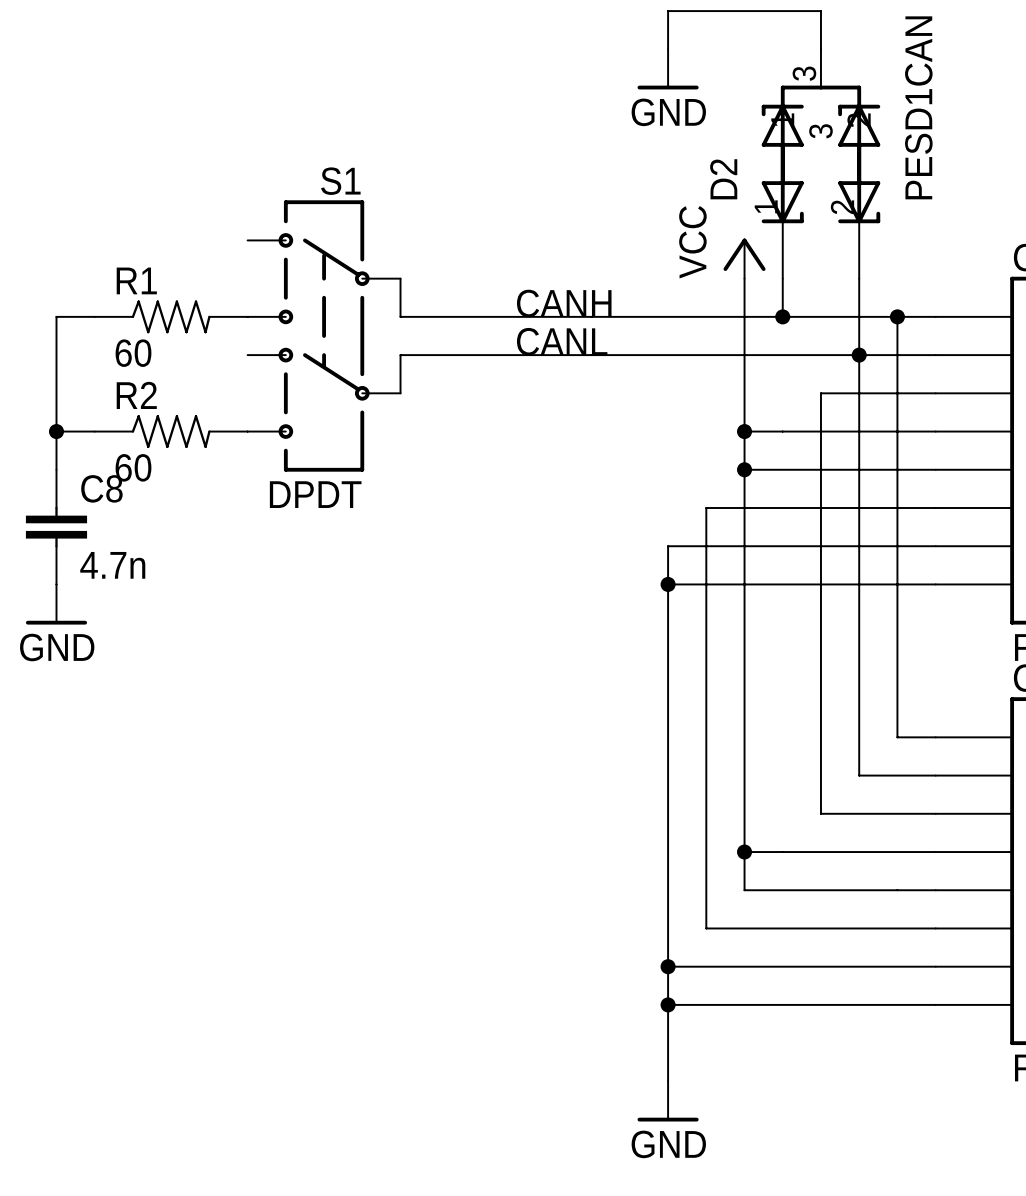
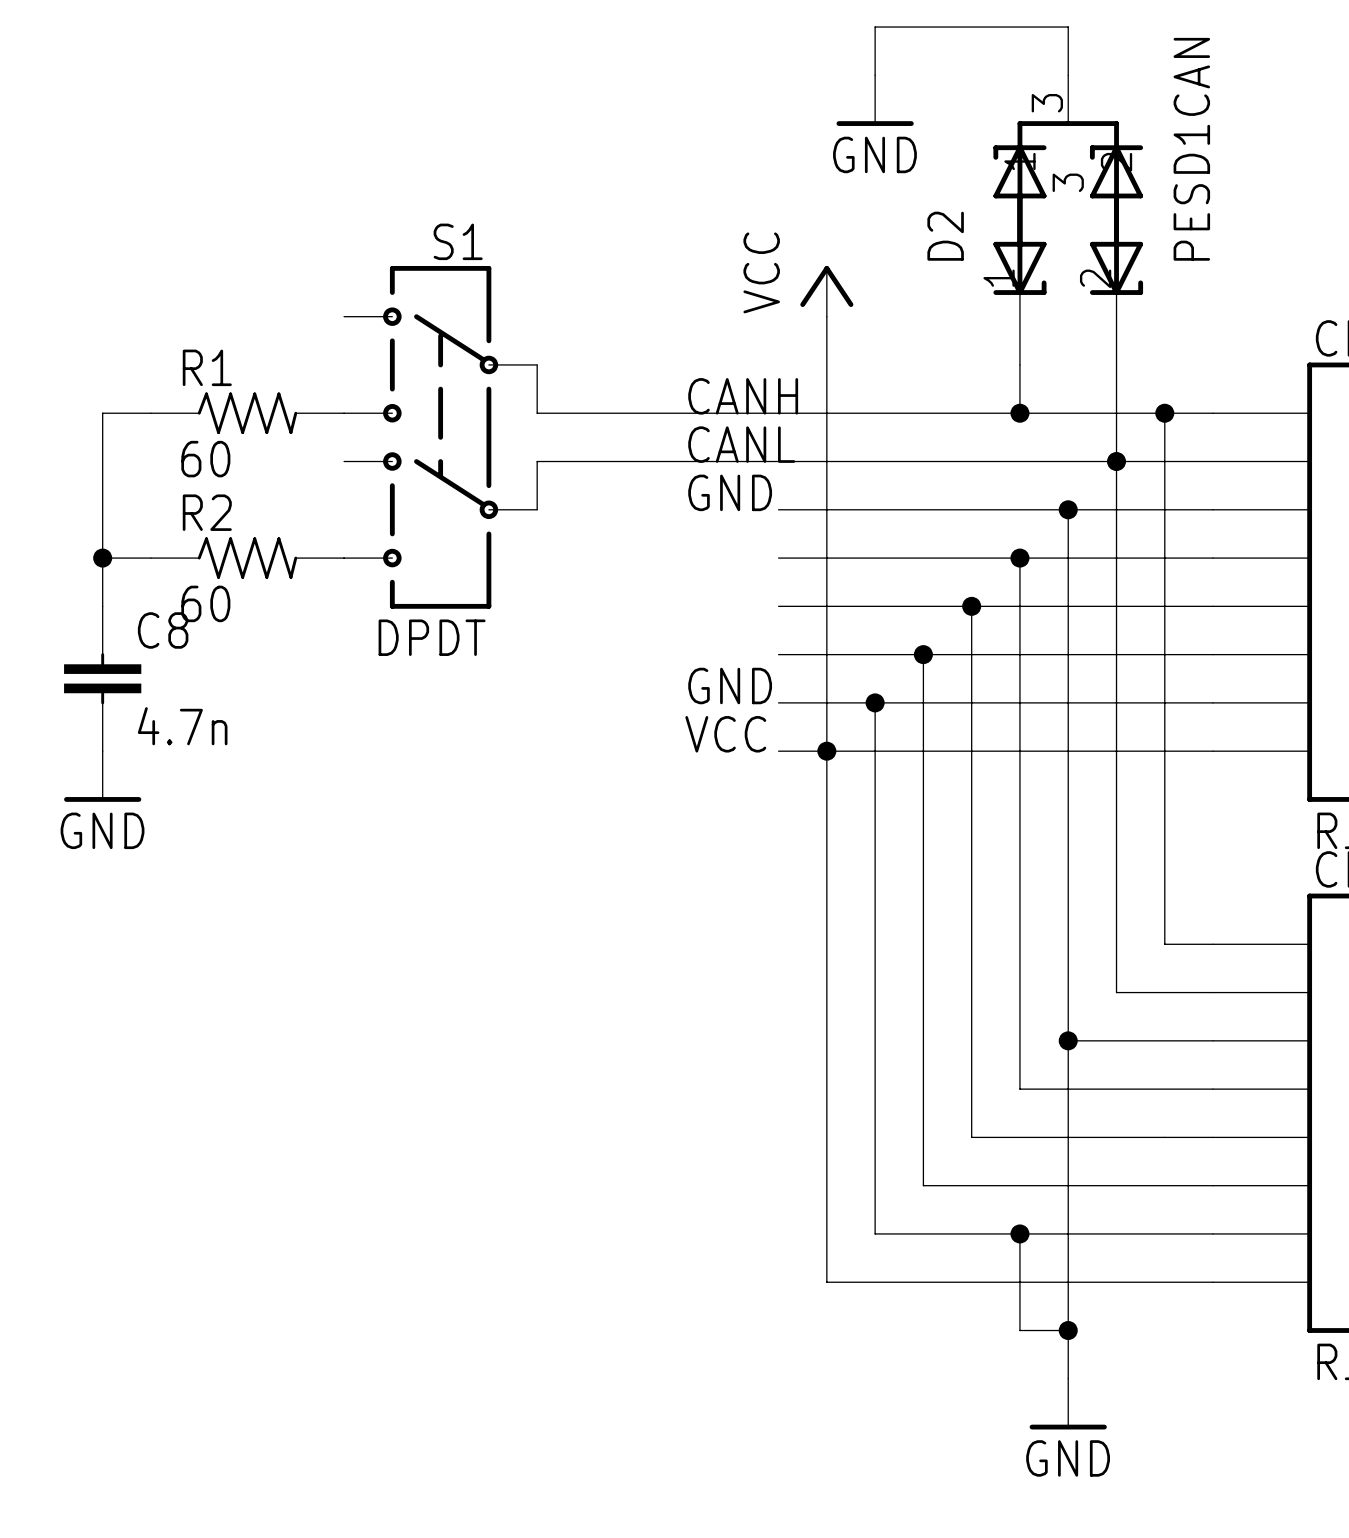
wire: none -> (826, 316) (826, 1282) (875, 1282)
power symbol position: VCC (744, 258) -> VCC (826, 291)
wire: (744, 278) (744, 469) -> (778, 606) (971, 606)
label: none -> GND (730, 492)
wire: none -> (778, 509) (1068, 509)
junction: none -> (1068, 509)
wire: none -> (778, 558) (971, 558)
junction position: (744, 431) -> (1019, 558)
wire: none -> (778, 654) (923, 654)
junction: none -> (923, 654)
label: none -> GND (730, 686)
wire: none -> (778, 702) (875, 702)
junction: none -> (875, 702)
label: none -> VCC (725, 734)
wire: none -> (778, 751) (875, 751)
junction: none -> (826, 751)
junction: (668, 584) -> none
wire: none -> (1068, 1040) (1068, 1378)
junction: none -> (1068, 1040)
wire: (744, 852) (782, 852) -> (1019, 558) (1019, 1089)
junction: (744, 852) -> none
wire: (668, 966) (668, 1081) -> none
junction: (668, 966) -> none
wire: none -> (1019, 1233) (1019, 1330) (1068, 1330)
junction: none -> (1019, 1233)
junction: (668, 1004) -> none
junction: none -> (1068, 1330)
power symbol position: GND (668, 1101) -> GND (1068, 1404)

